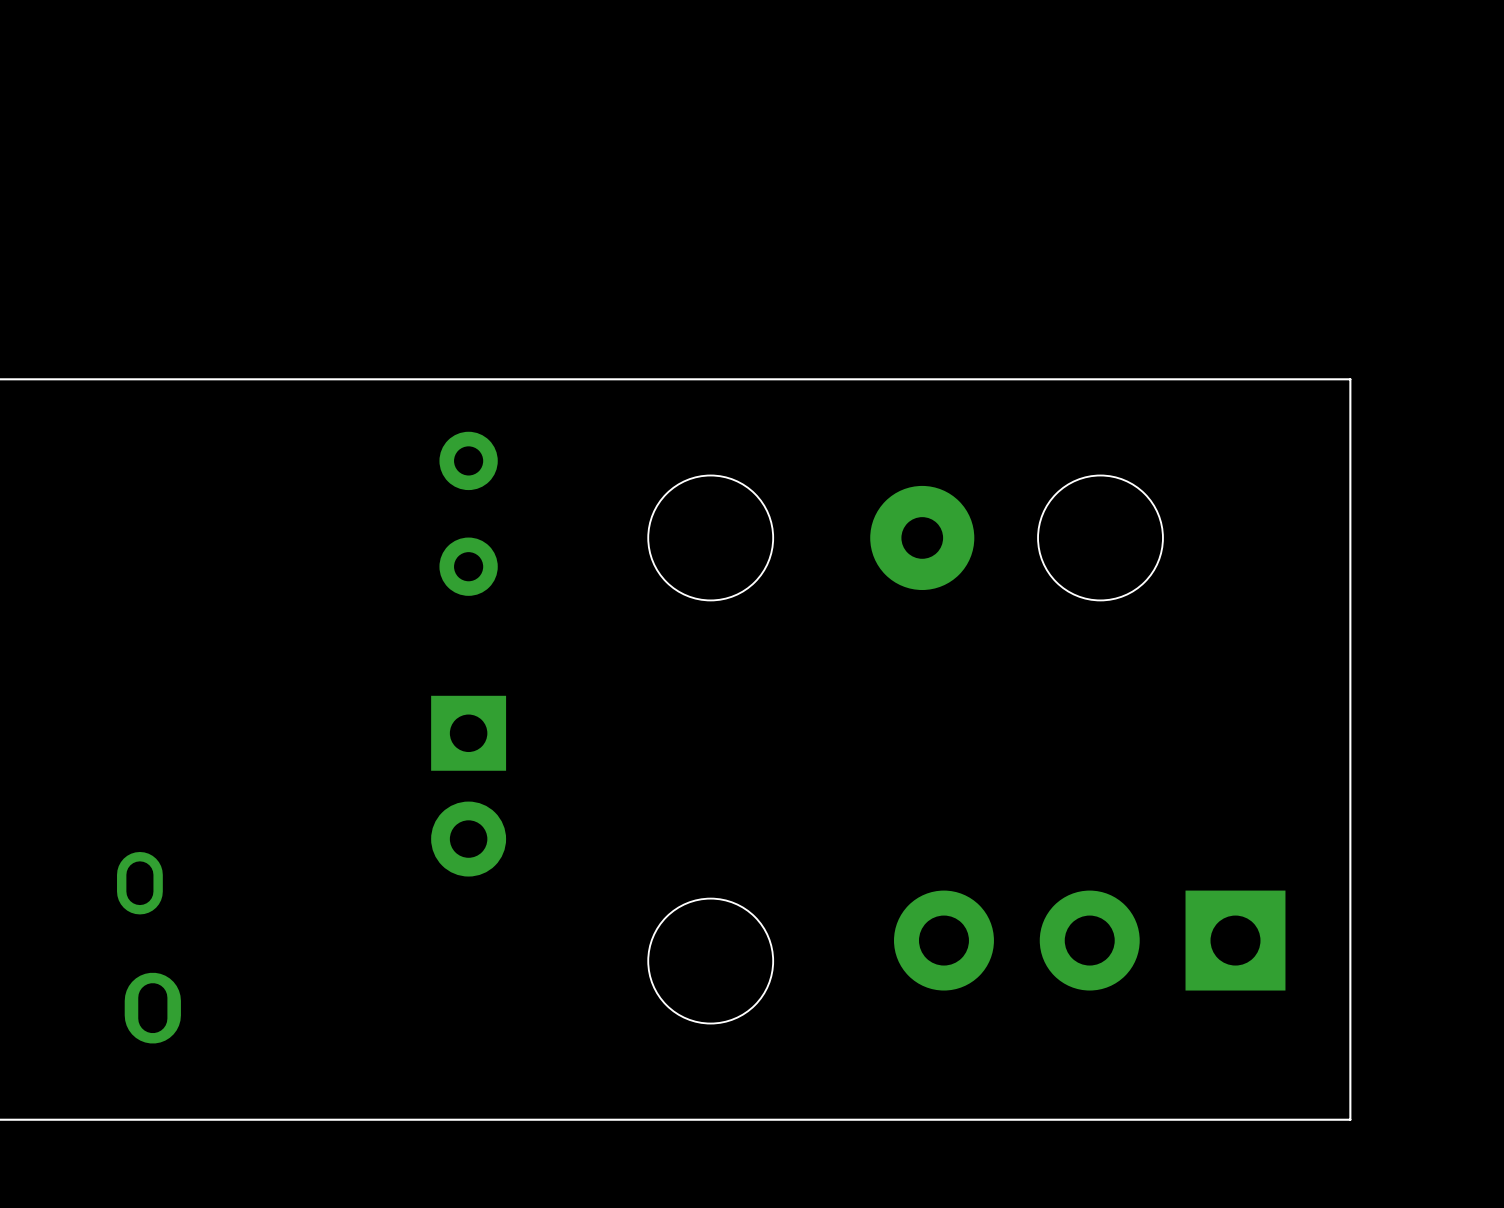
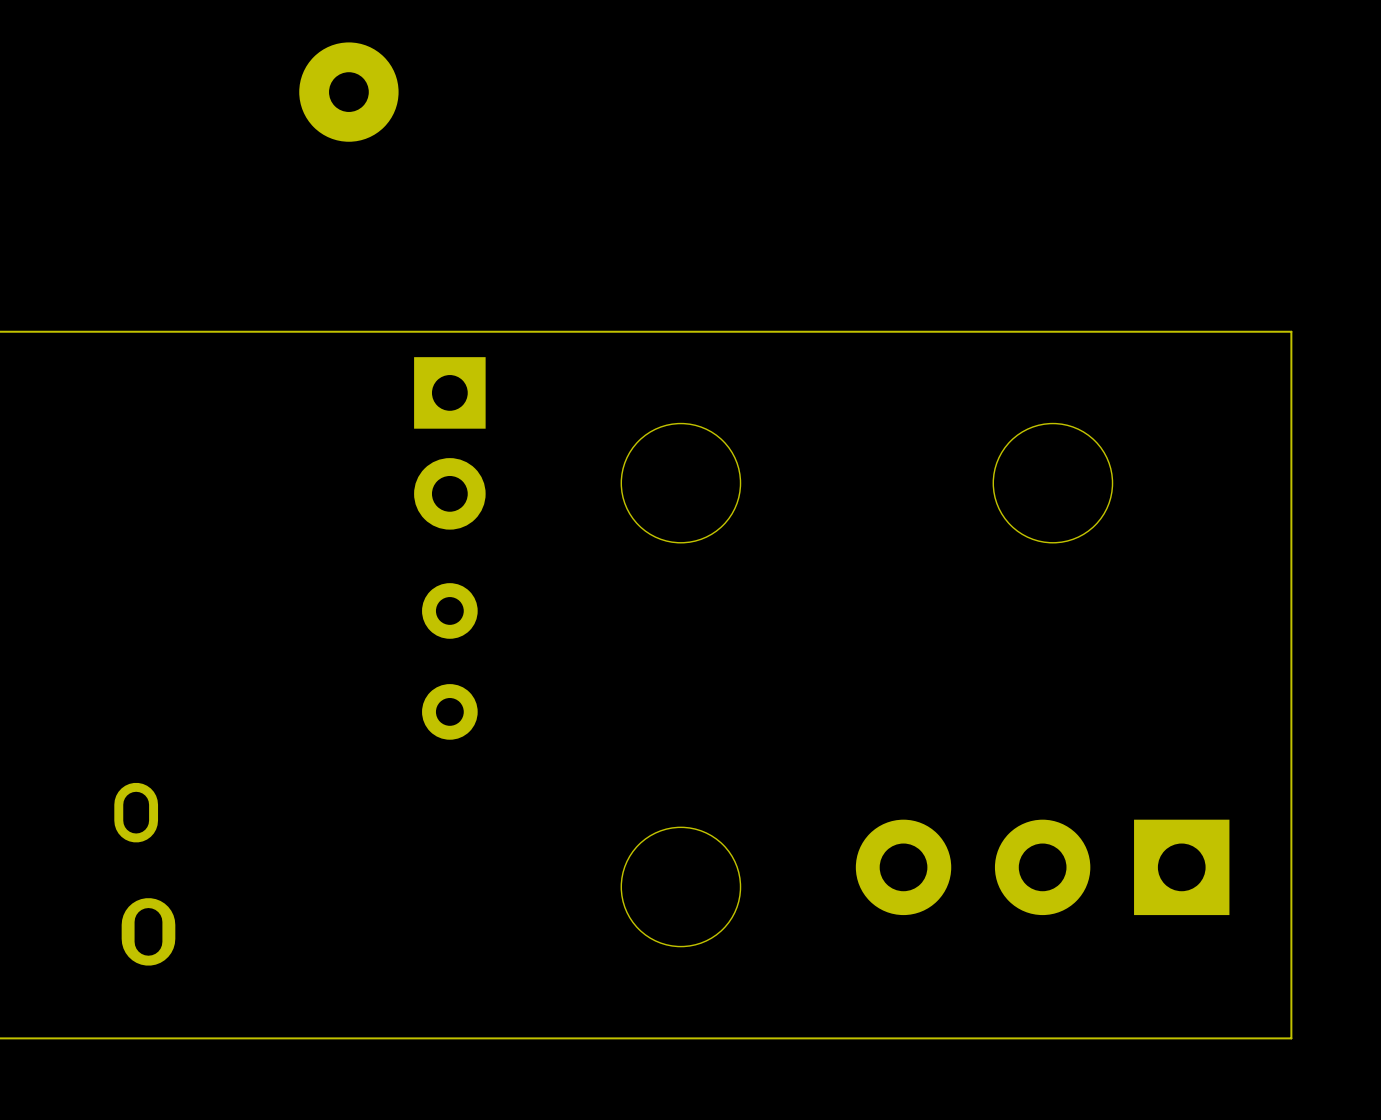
part footprint: [439, 431, 498, 596] -> [414, 357, 486, 530]
part position: (922, 537) -> (348, 92)
part: none -> (449, 661)
part: (468, 786) -> none

